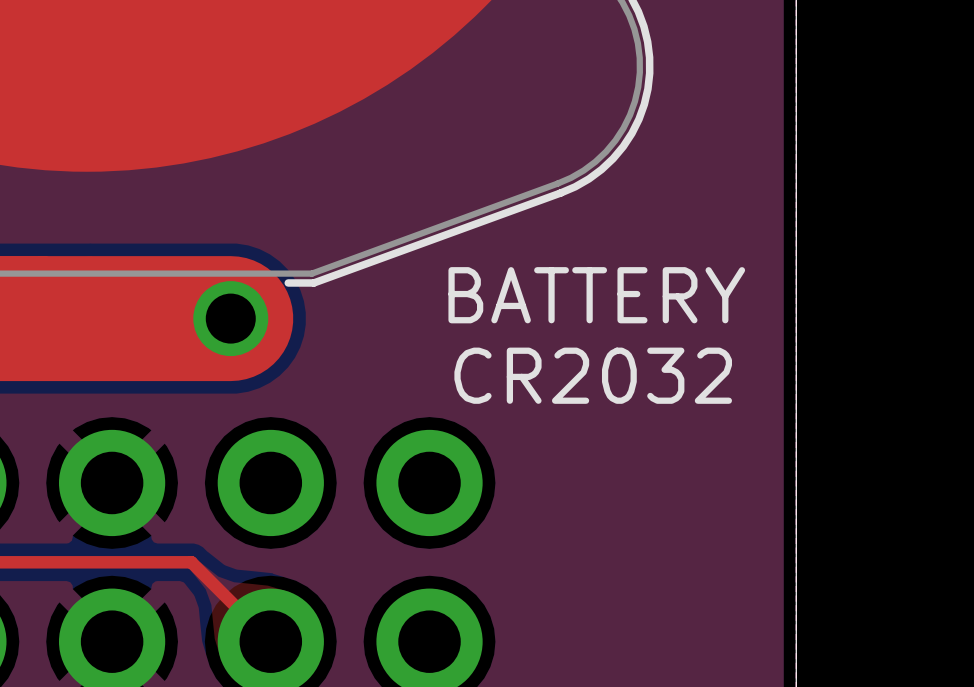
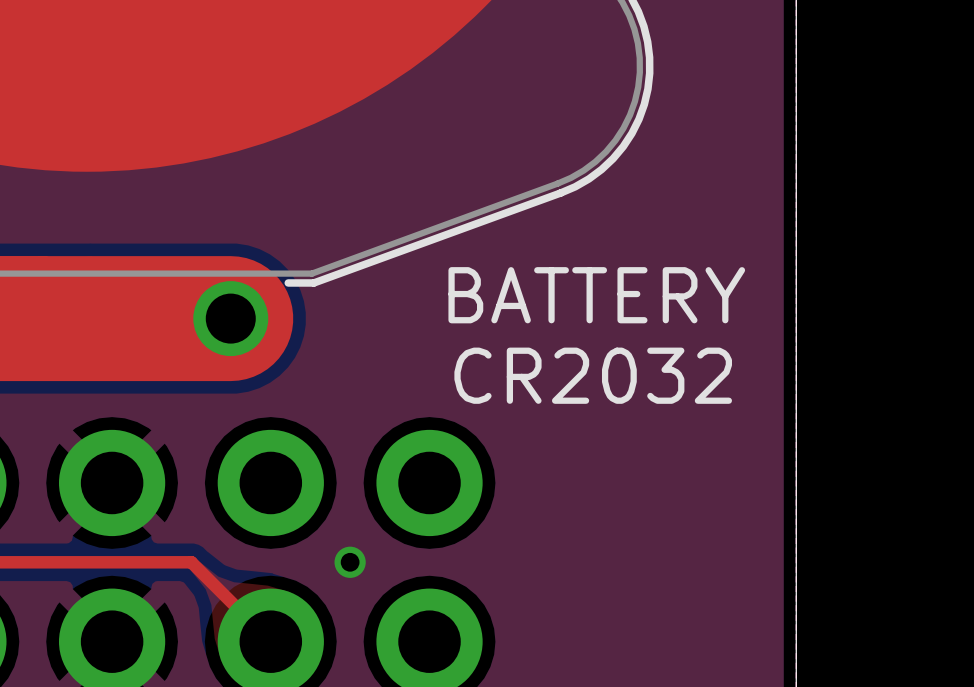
via: none -> (350, 562)

